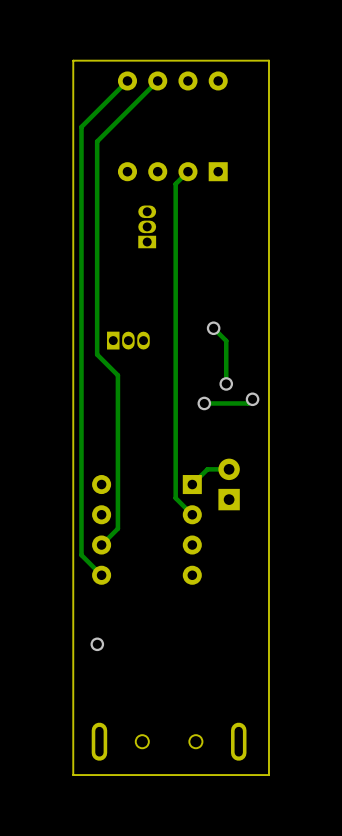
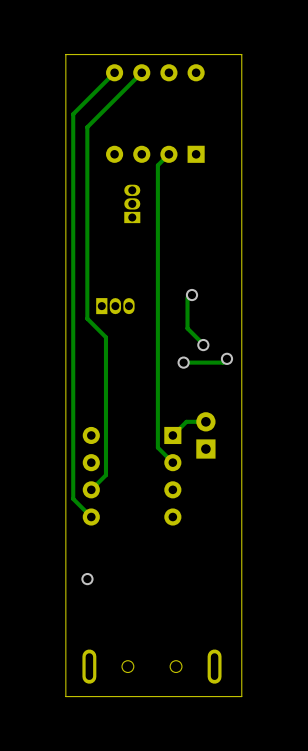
track: (213, 328) (226, 340) (226, 383) -> none
track: none -> (187, 297) (187, 328) (205, 346)

